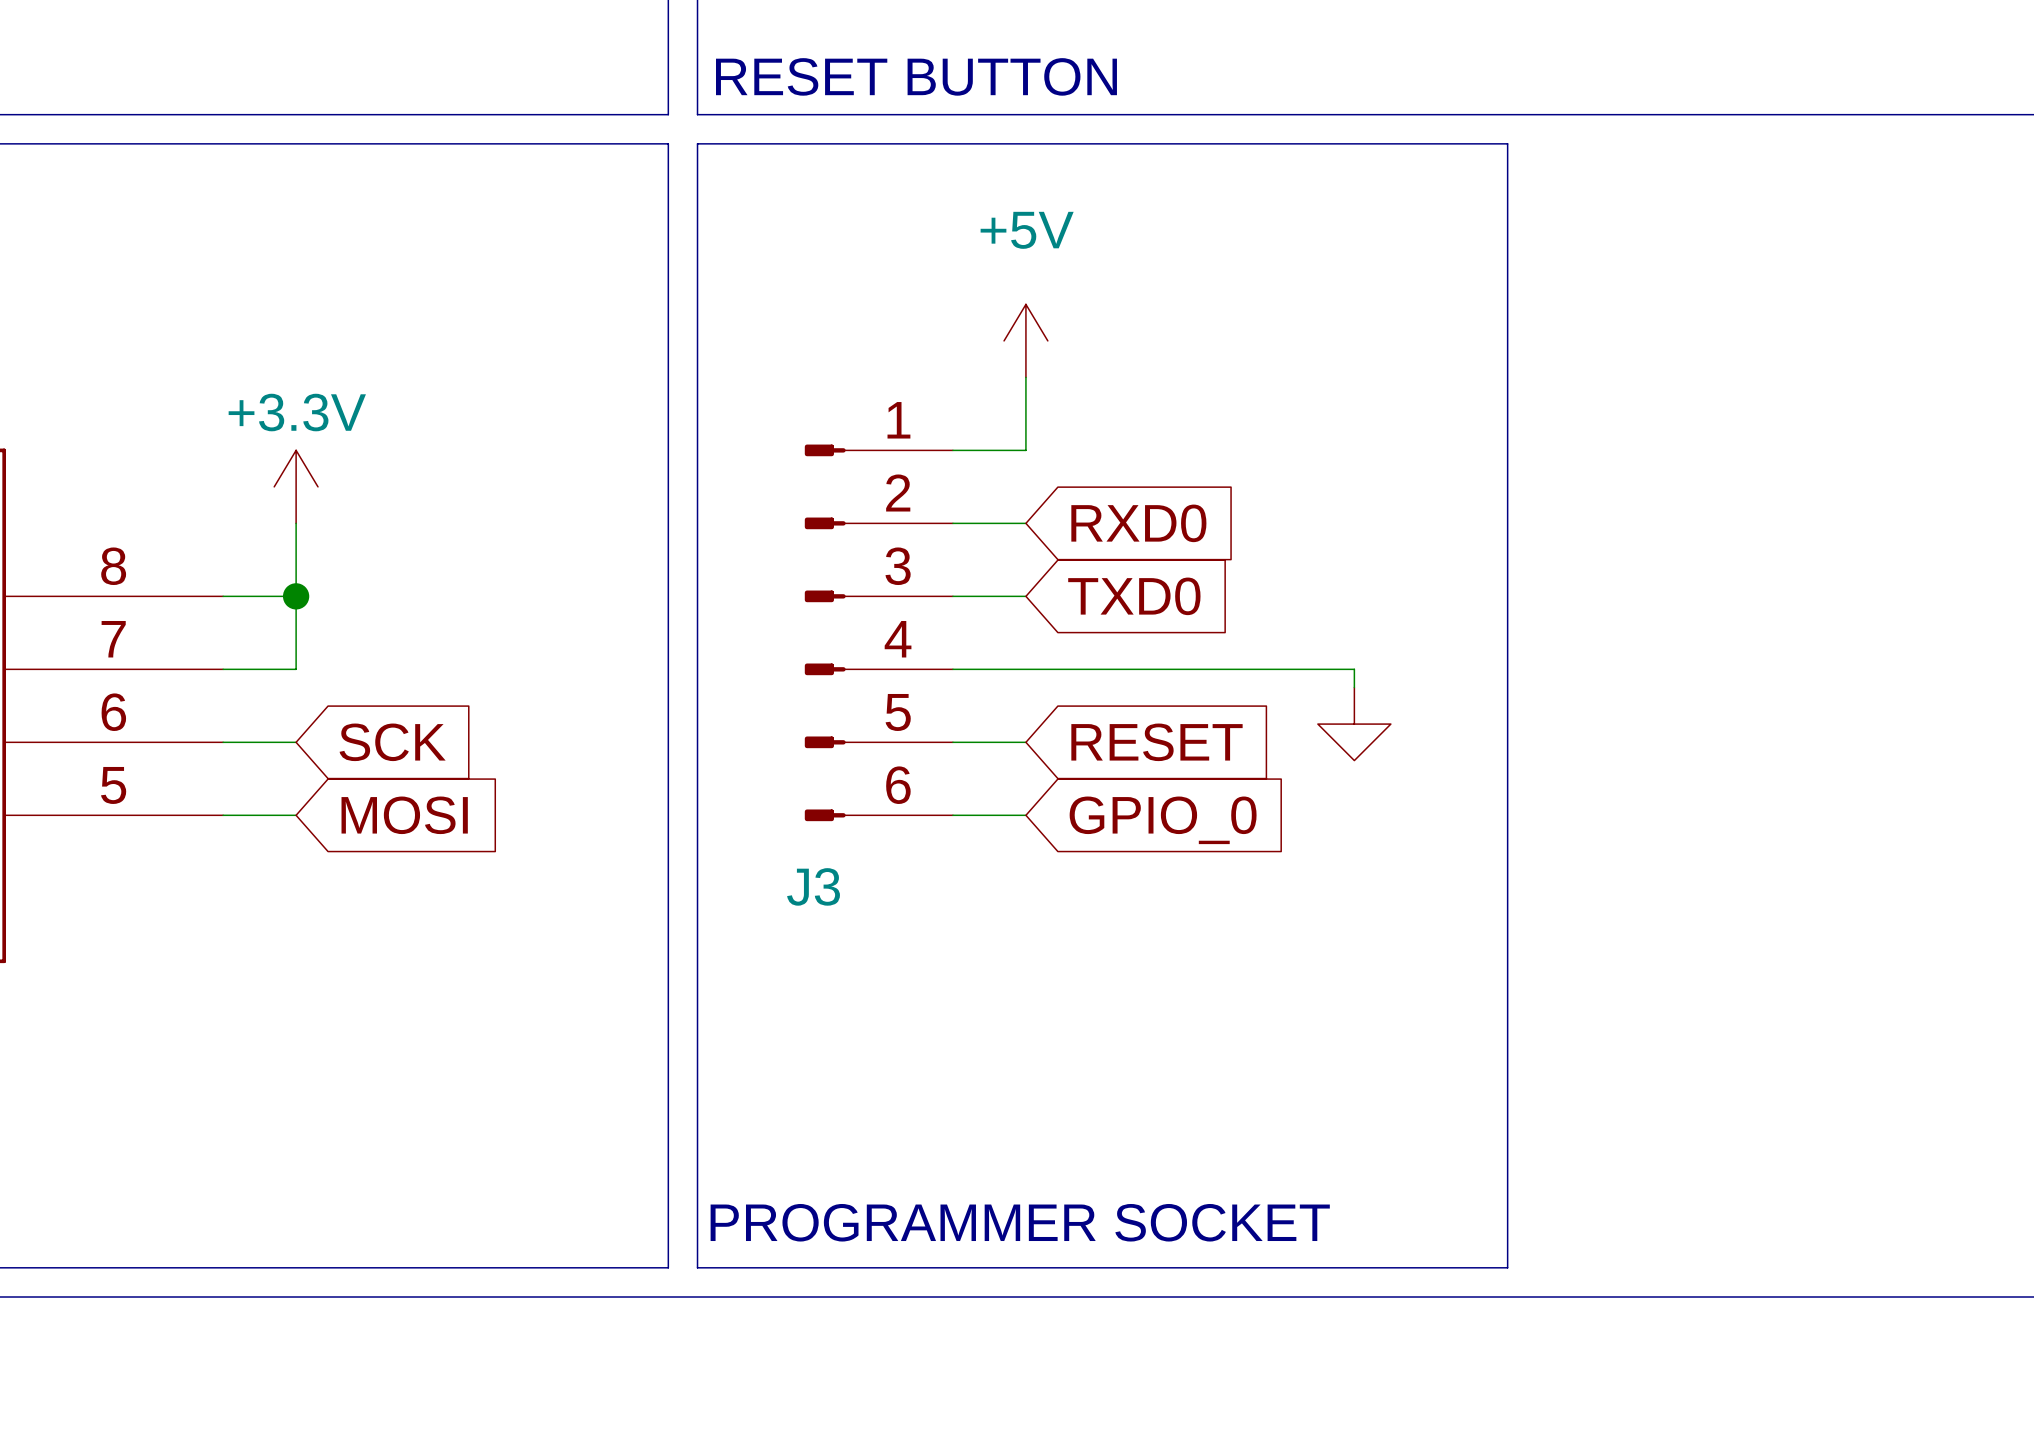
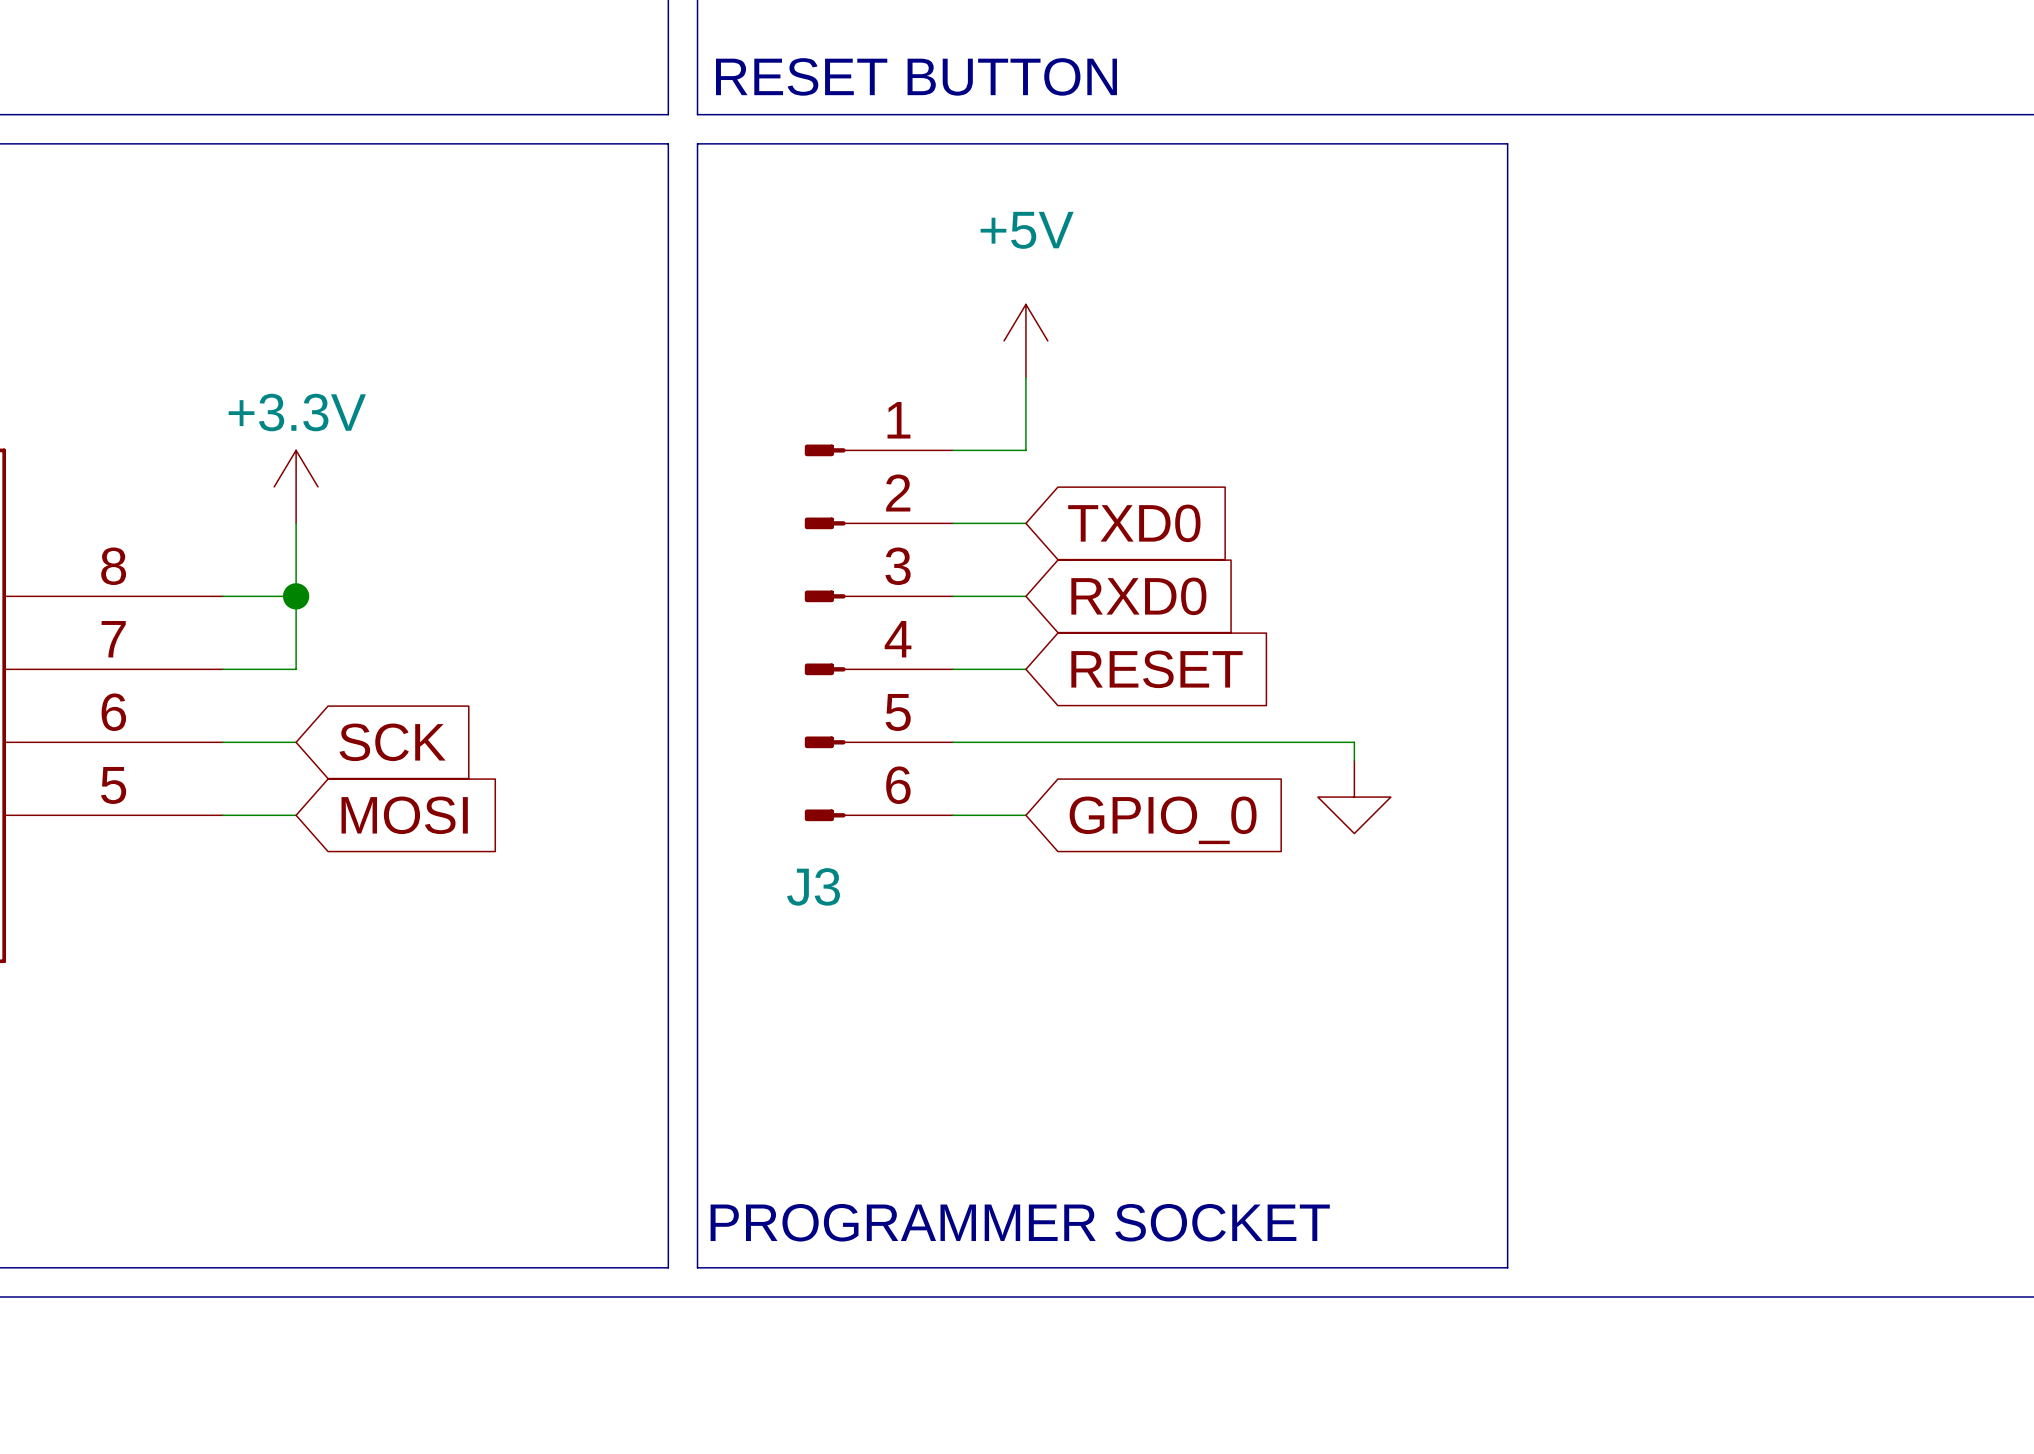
global label: RXD0 (1138, 523) -> TXD0 (1134, 523)
global label: TXD0 (1134, 596) -> RXD0 (1138, 596)
wire: (1025, 669) (1354, 669) (1354, 687) -> (1025, 742) (1354, 742) (1354, 760)
power symbol position: (1354, 724) -> (1354, 797)
global label position: RESET (1156, 742) -> RESET (1156, 669)

